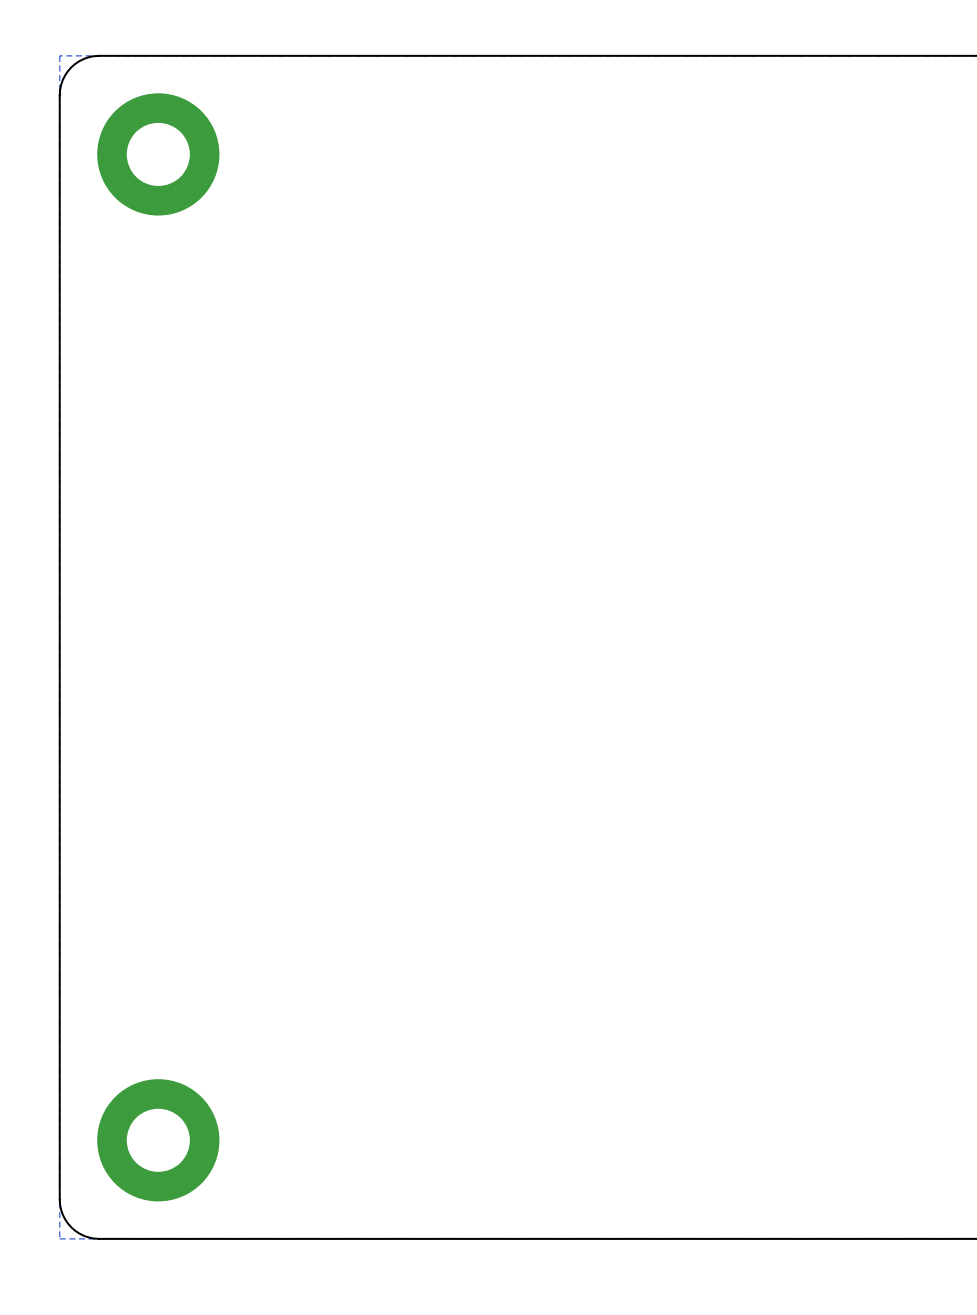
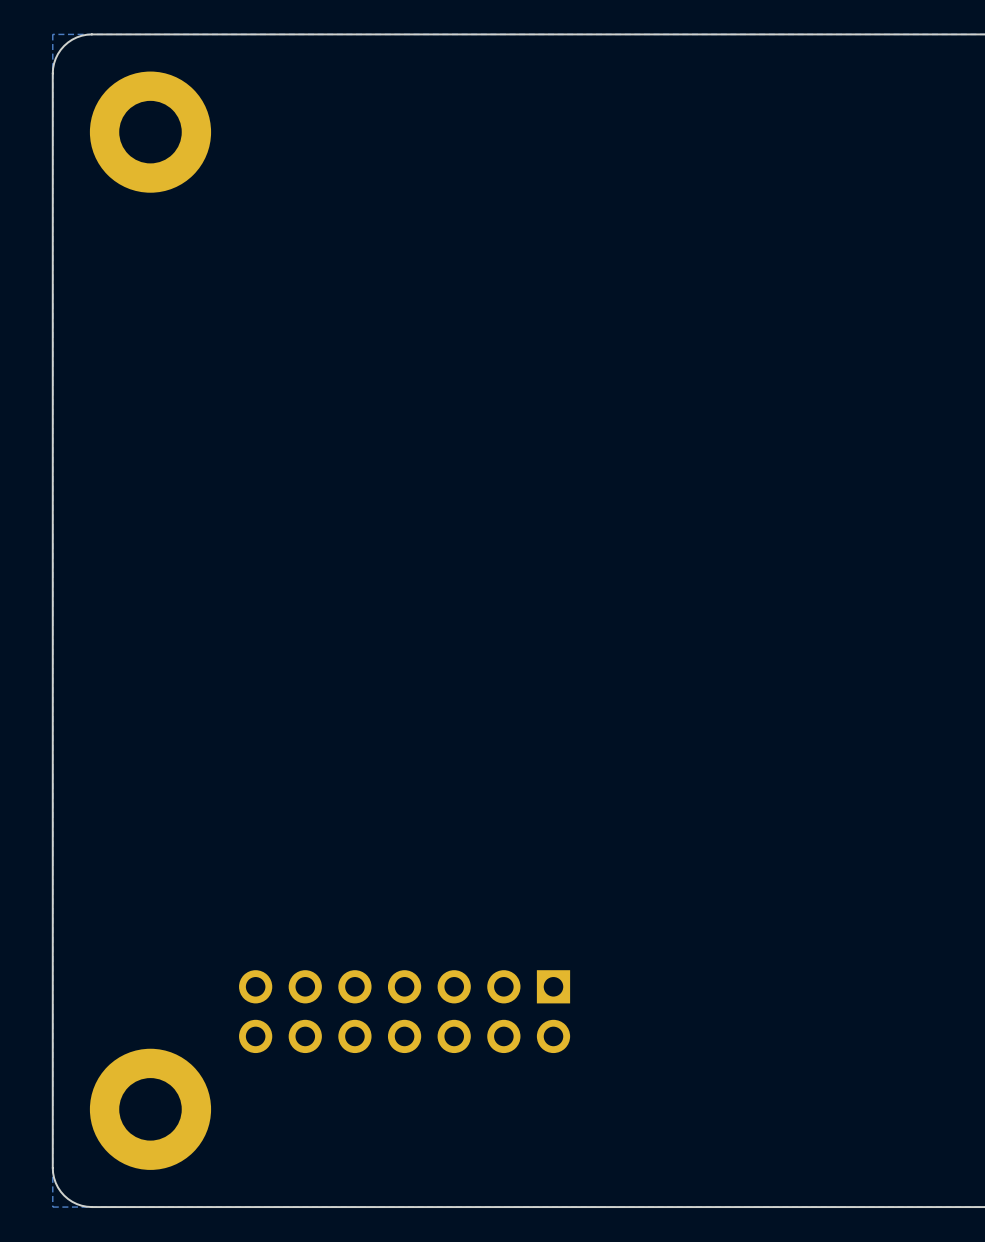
part: none -> (404, 1011)

